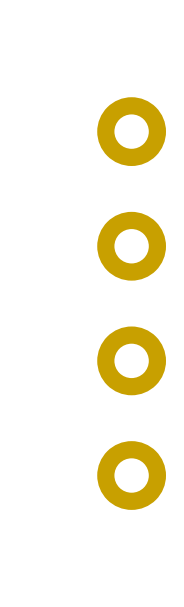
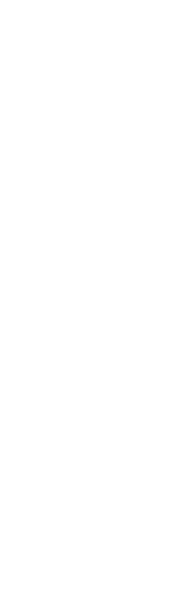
part: (131, 303) -> none

